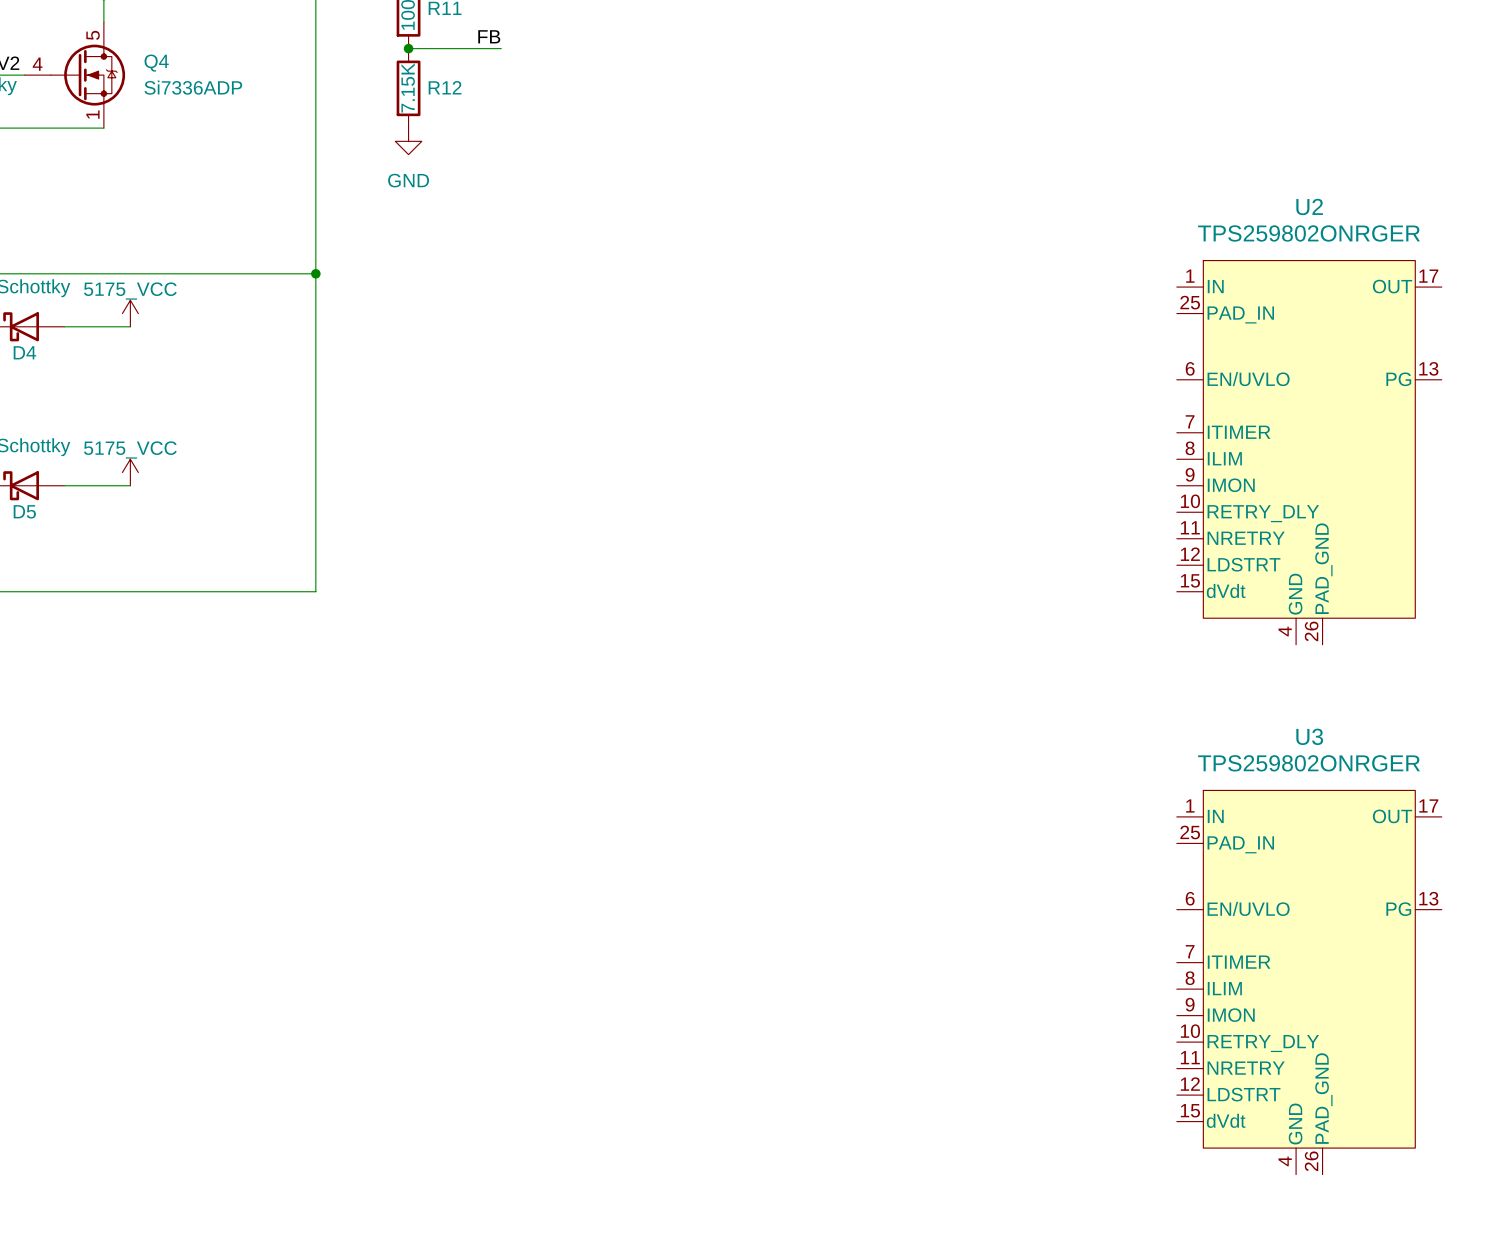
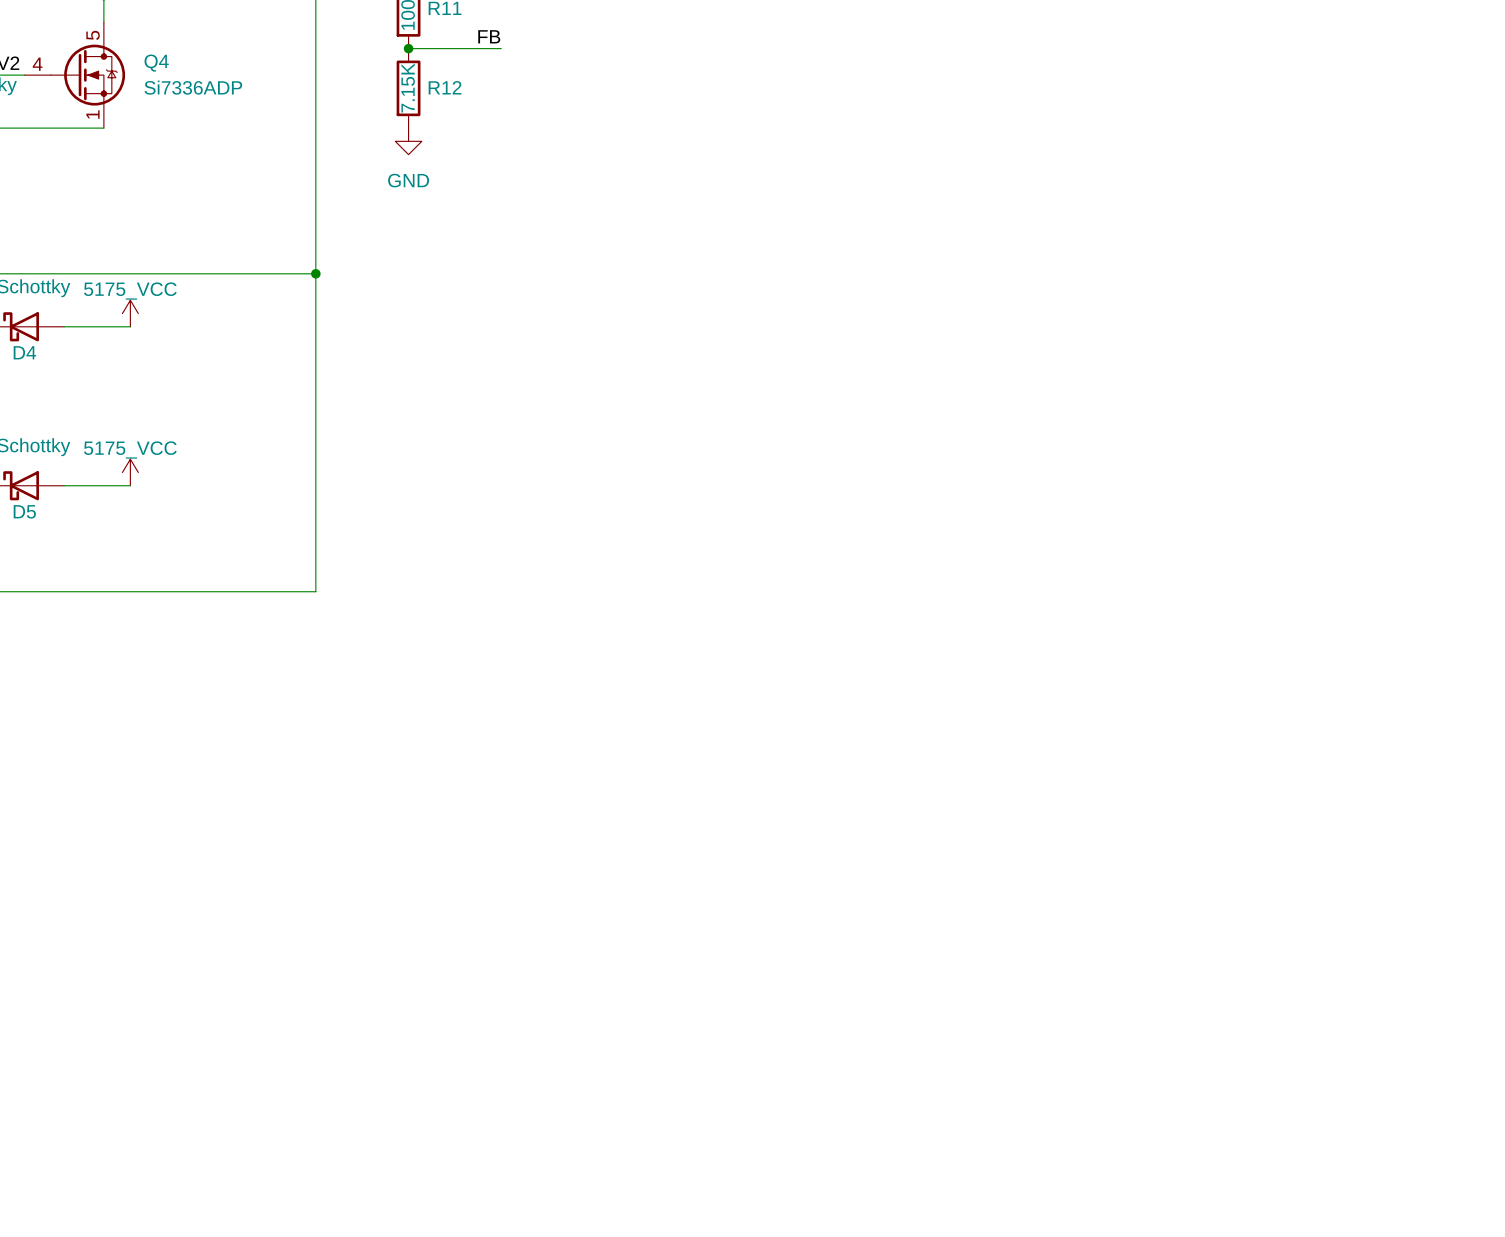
U2: TPS259802ONRGER (1309, 452) -> none
U3: TPS259802ONRGER (1309, 982) -> none

